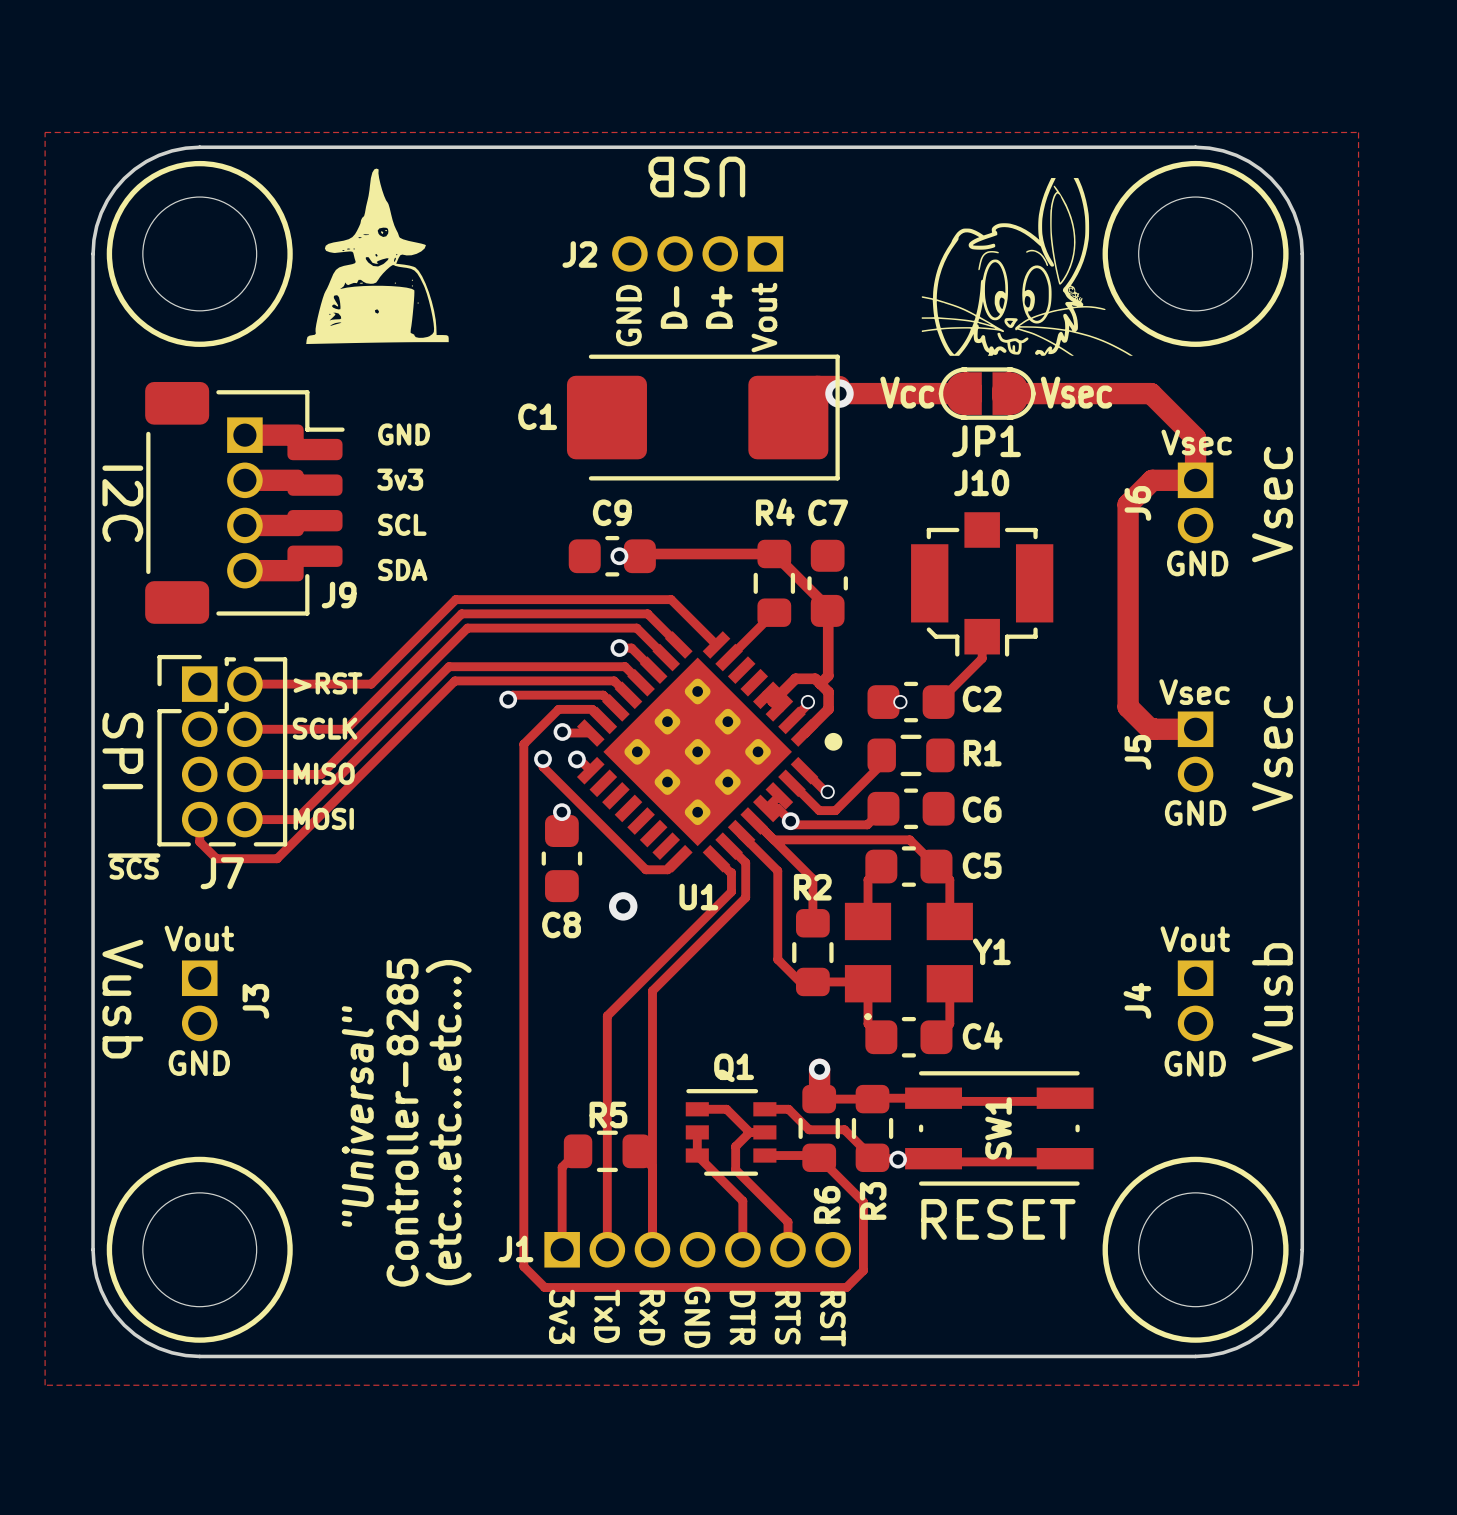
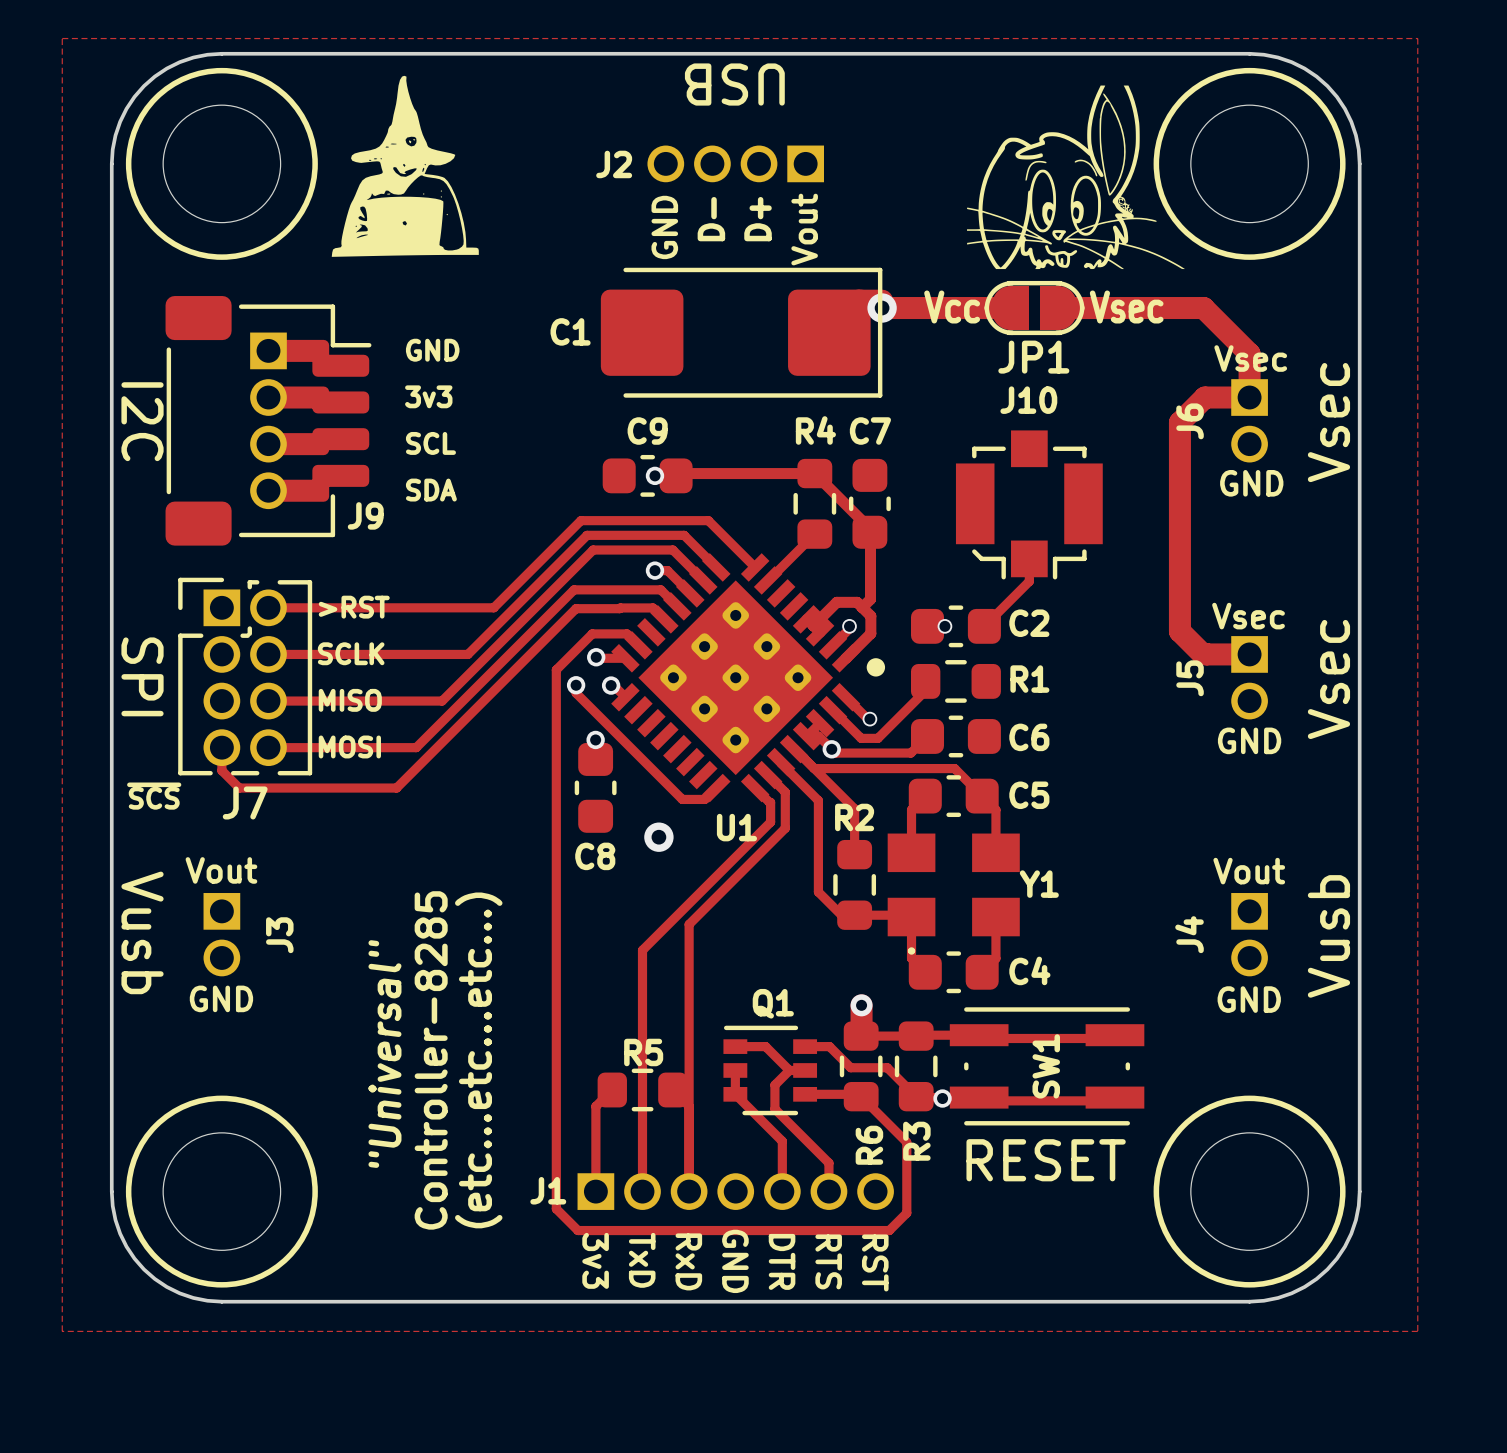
track: (547, 599) (455, 599) (371, 684) -> (580, 520) (493, 607) (398, 607)
track: (553, 613) (461, 613) (346, 729) -> (587, 535) (467, 654) (373, 654)
track: (559, 628) (467, 628) (321, 774) -> (593, 550) (442, 701) (347, 701)
track: (540, 666) (449, 666) (296, 819) -> (574, 589) (416, 747) (321, 747)
track: (617, 684) (614, 680) (454, 680) (277, 858) -> (652, 607) (575, 608) (396, 788) (301, 788)
track: (508, 699) (512, 695) (603, 695) (615, 707) -> none
via: (508, 699) -> none

